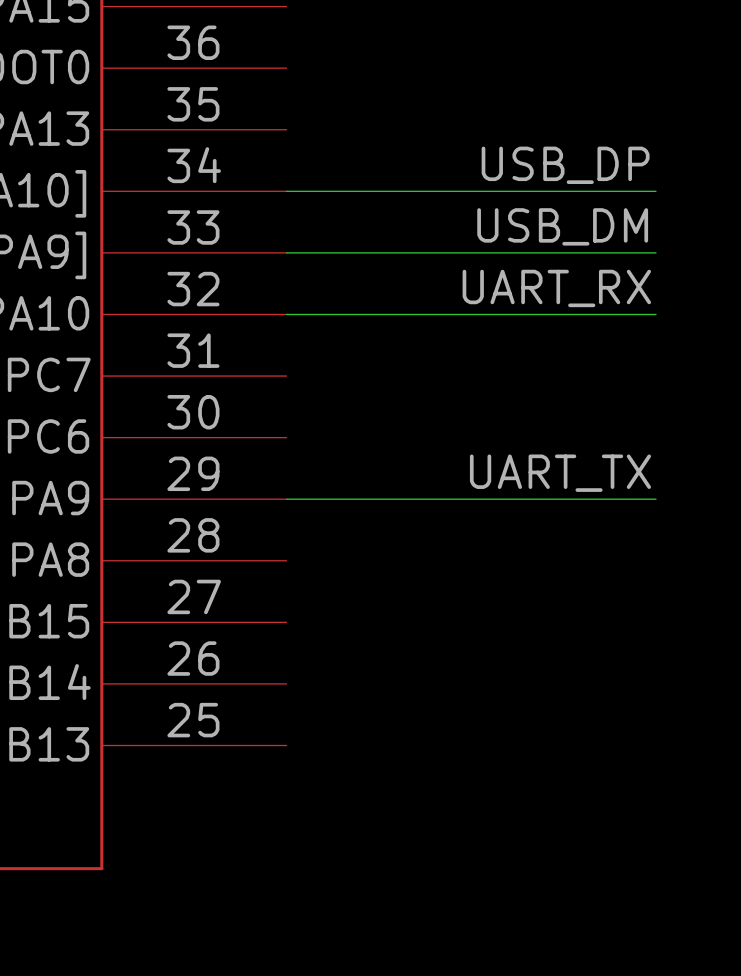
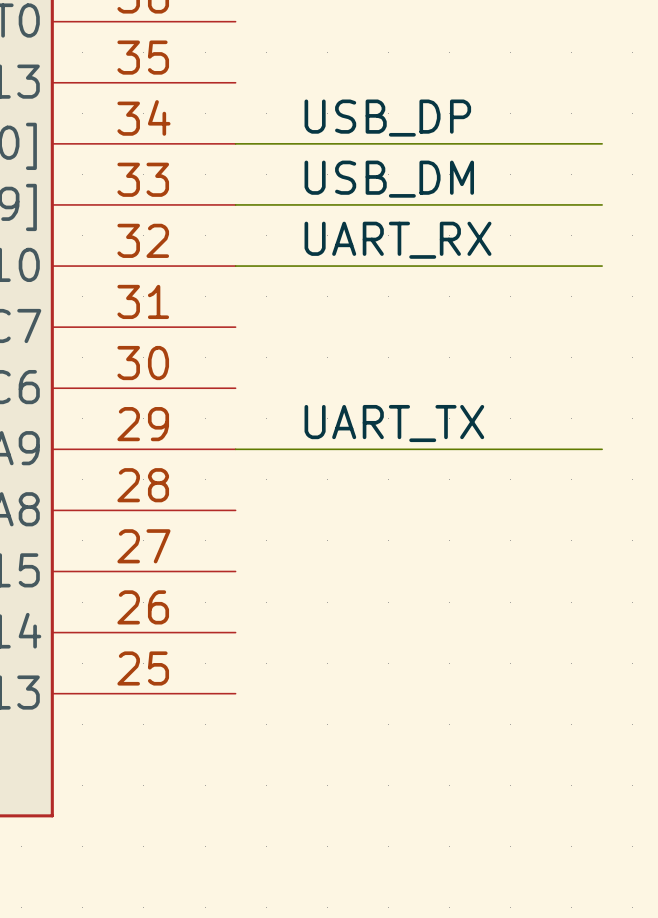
label position: USB_DP (565, 165) -> USB_DP (387, 118)
label position: USB_DM (562, 226) -> USB_DM (389, 179)
label position: UART_RX (556, 288) -> UART_RX (397, 240)
label position: UART_TX (560, 473) -> UART_TX (394, 423)

